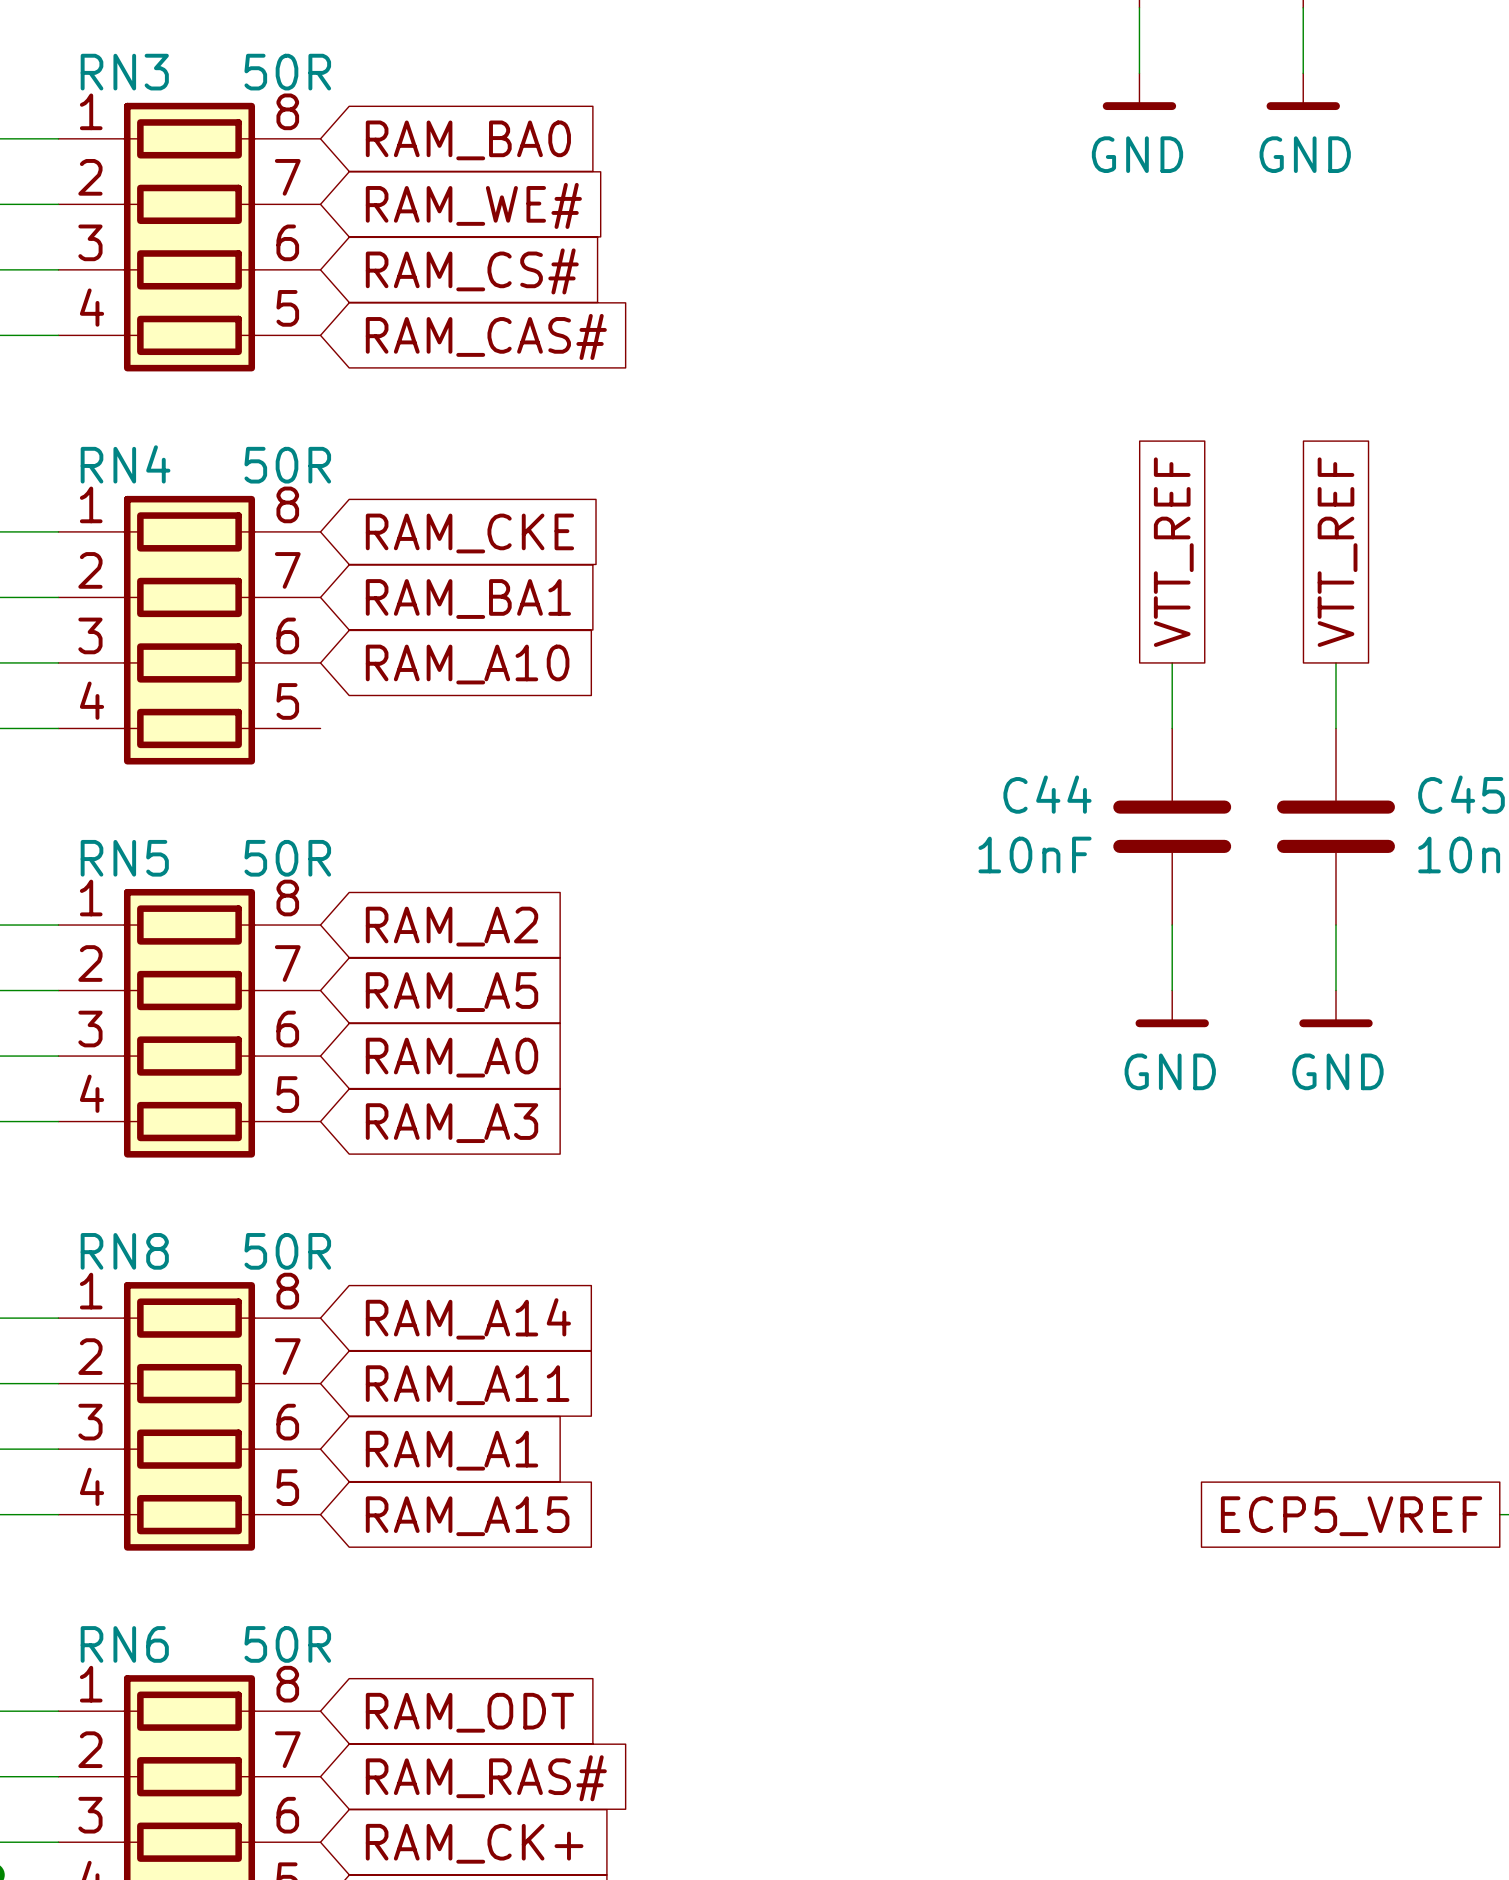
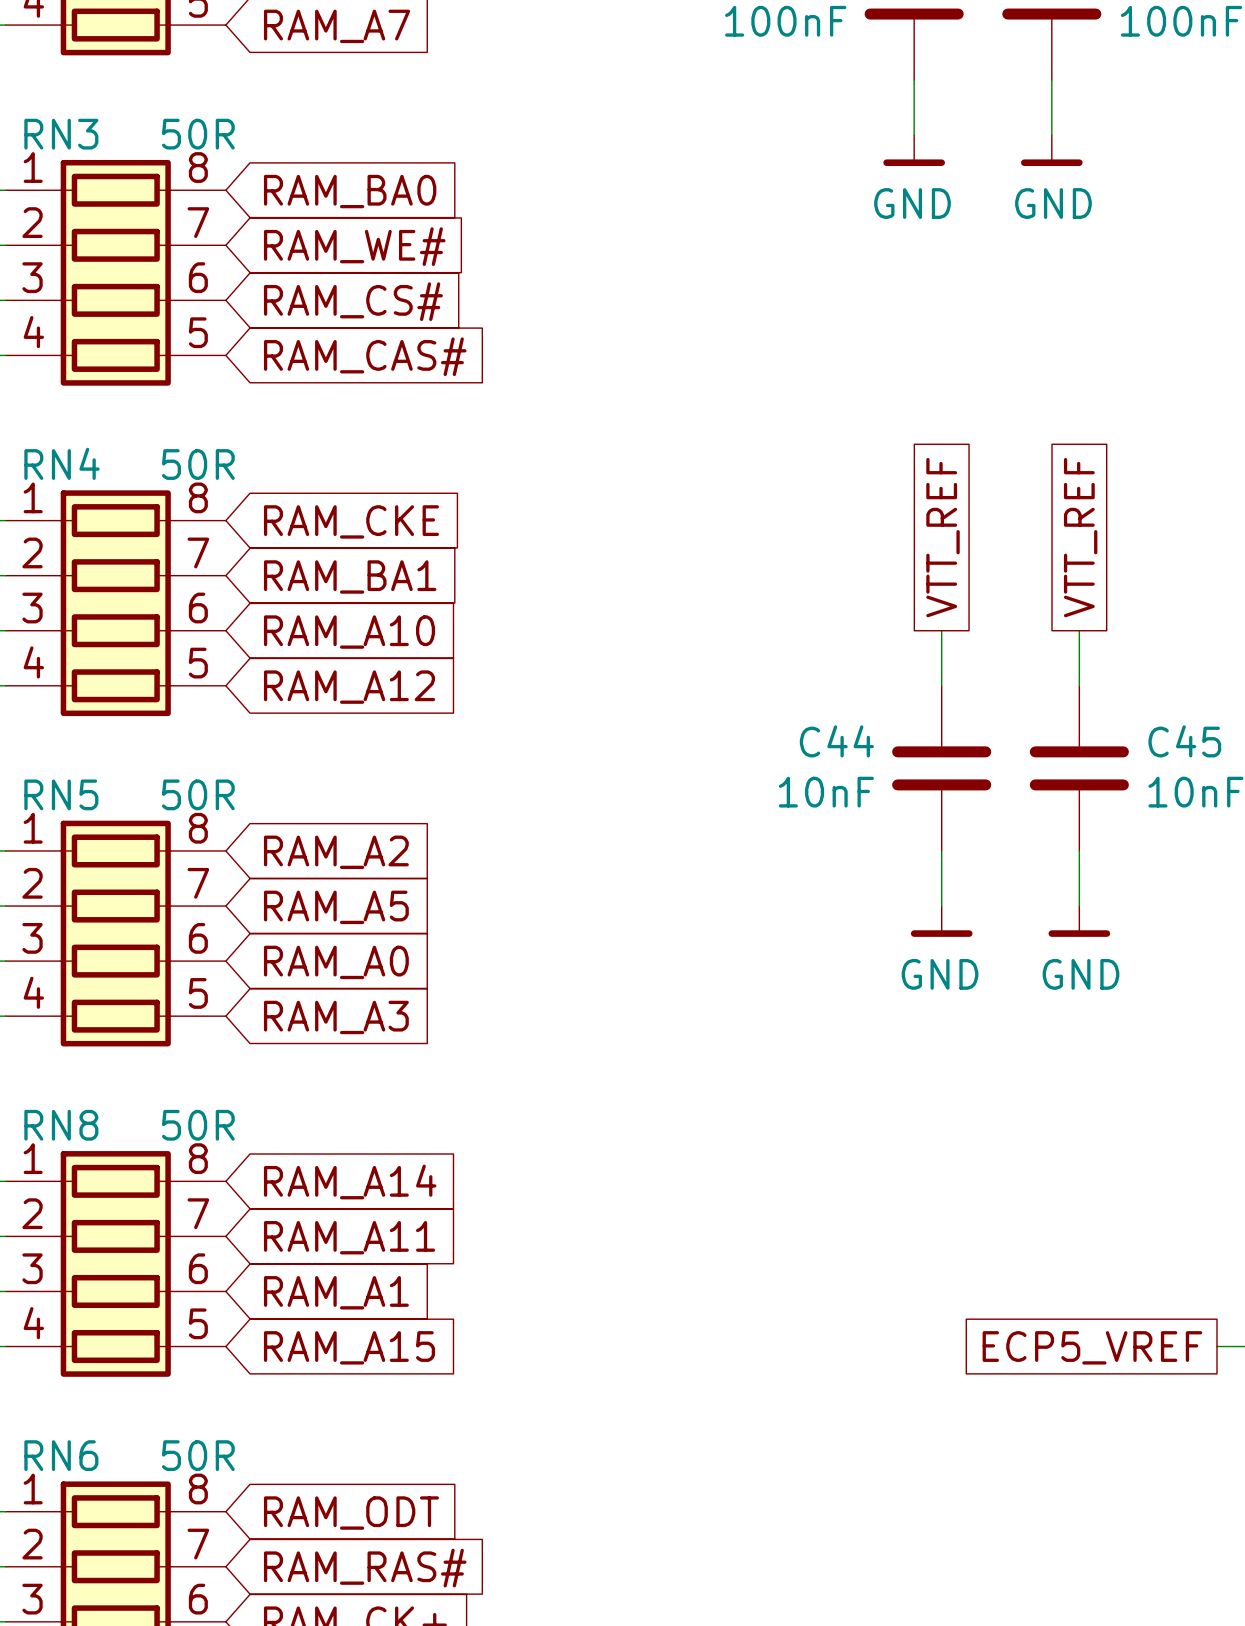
global label: none -> RAM_A12 (349, 687)

